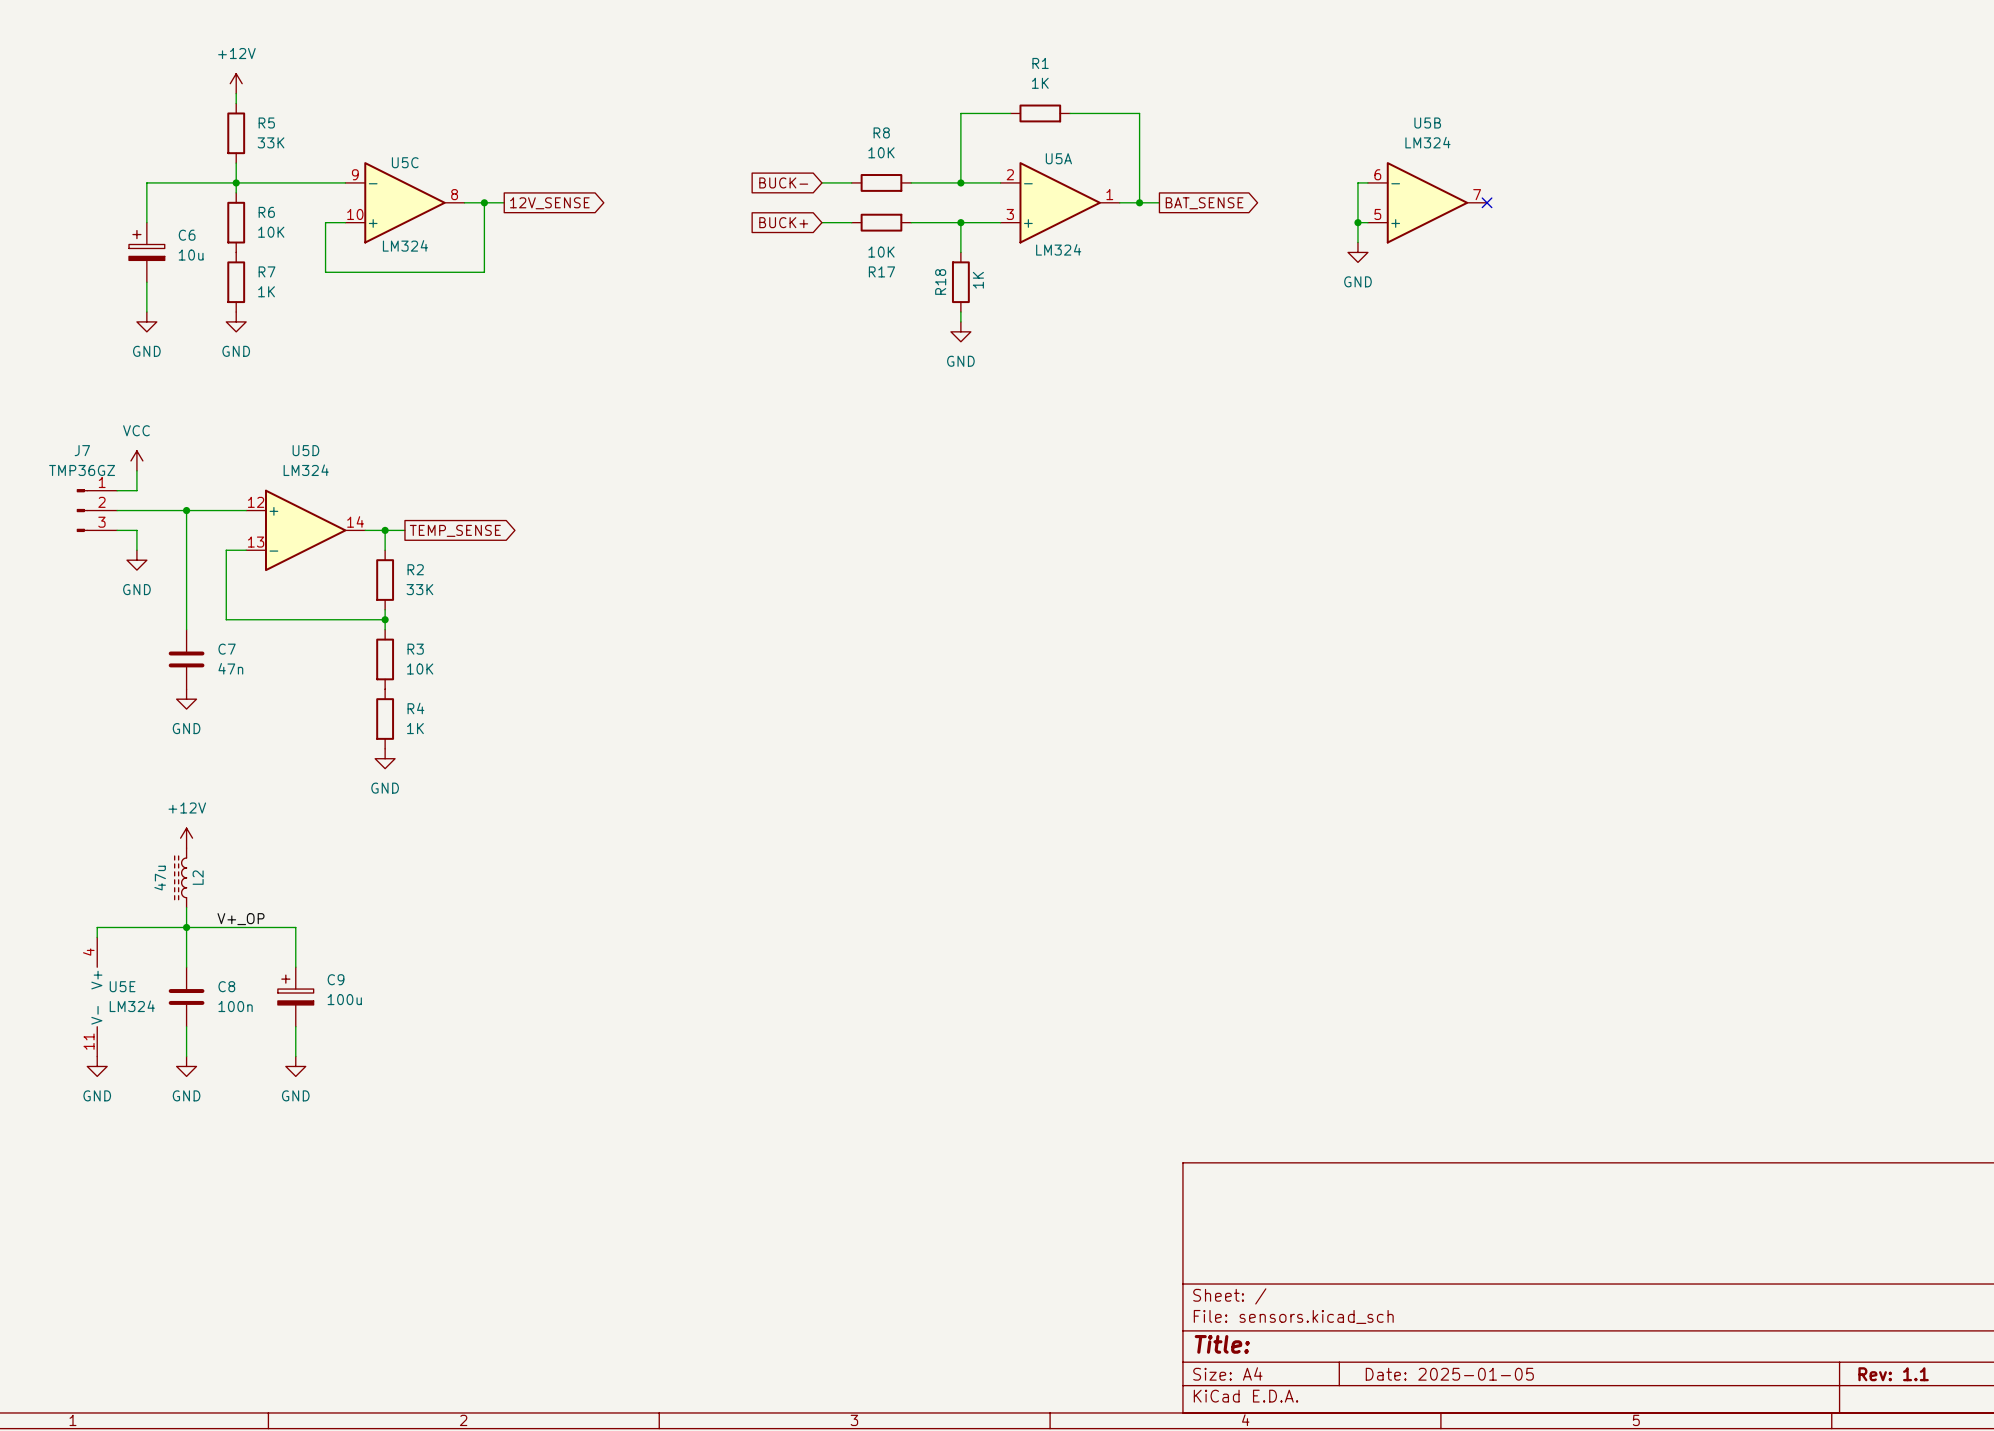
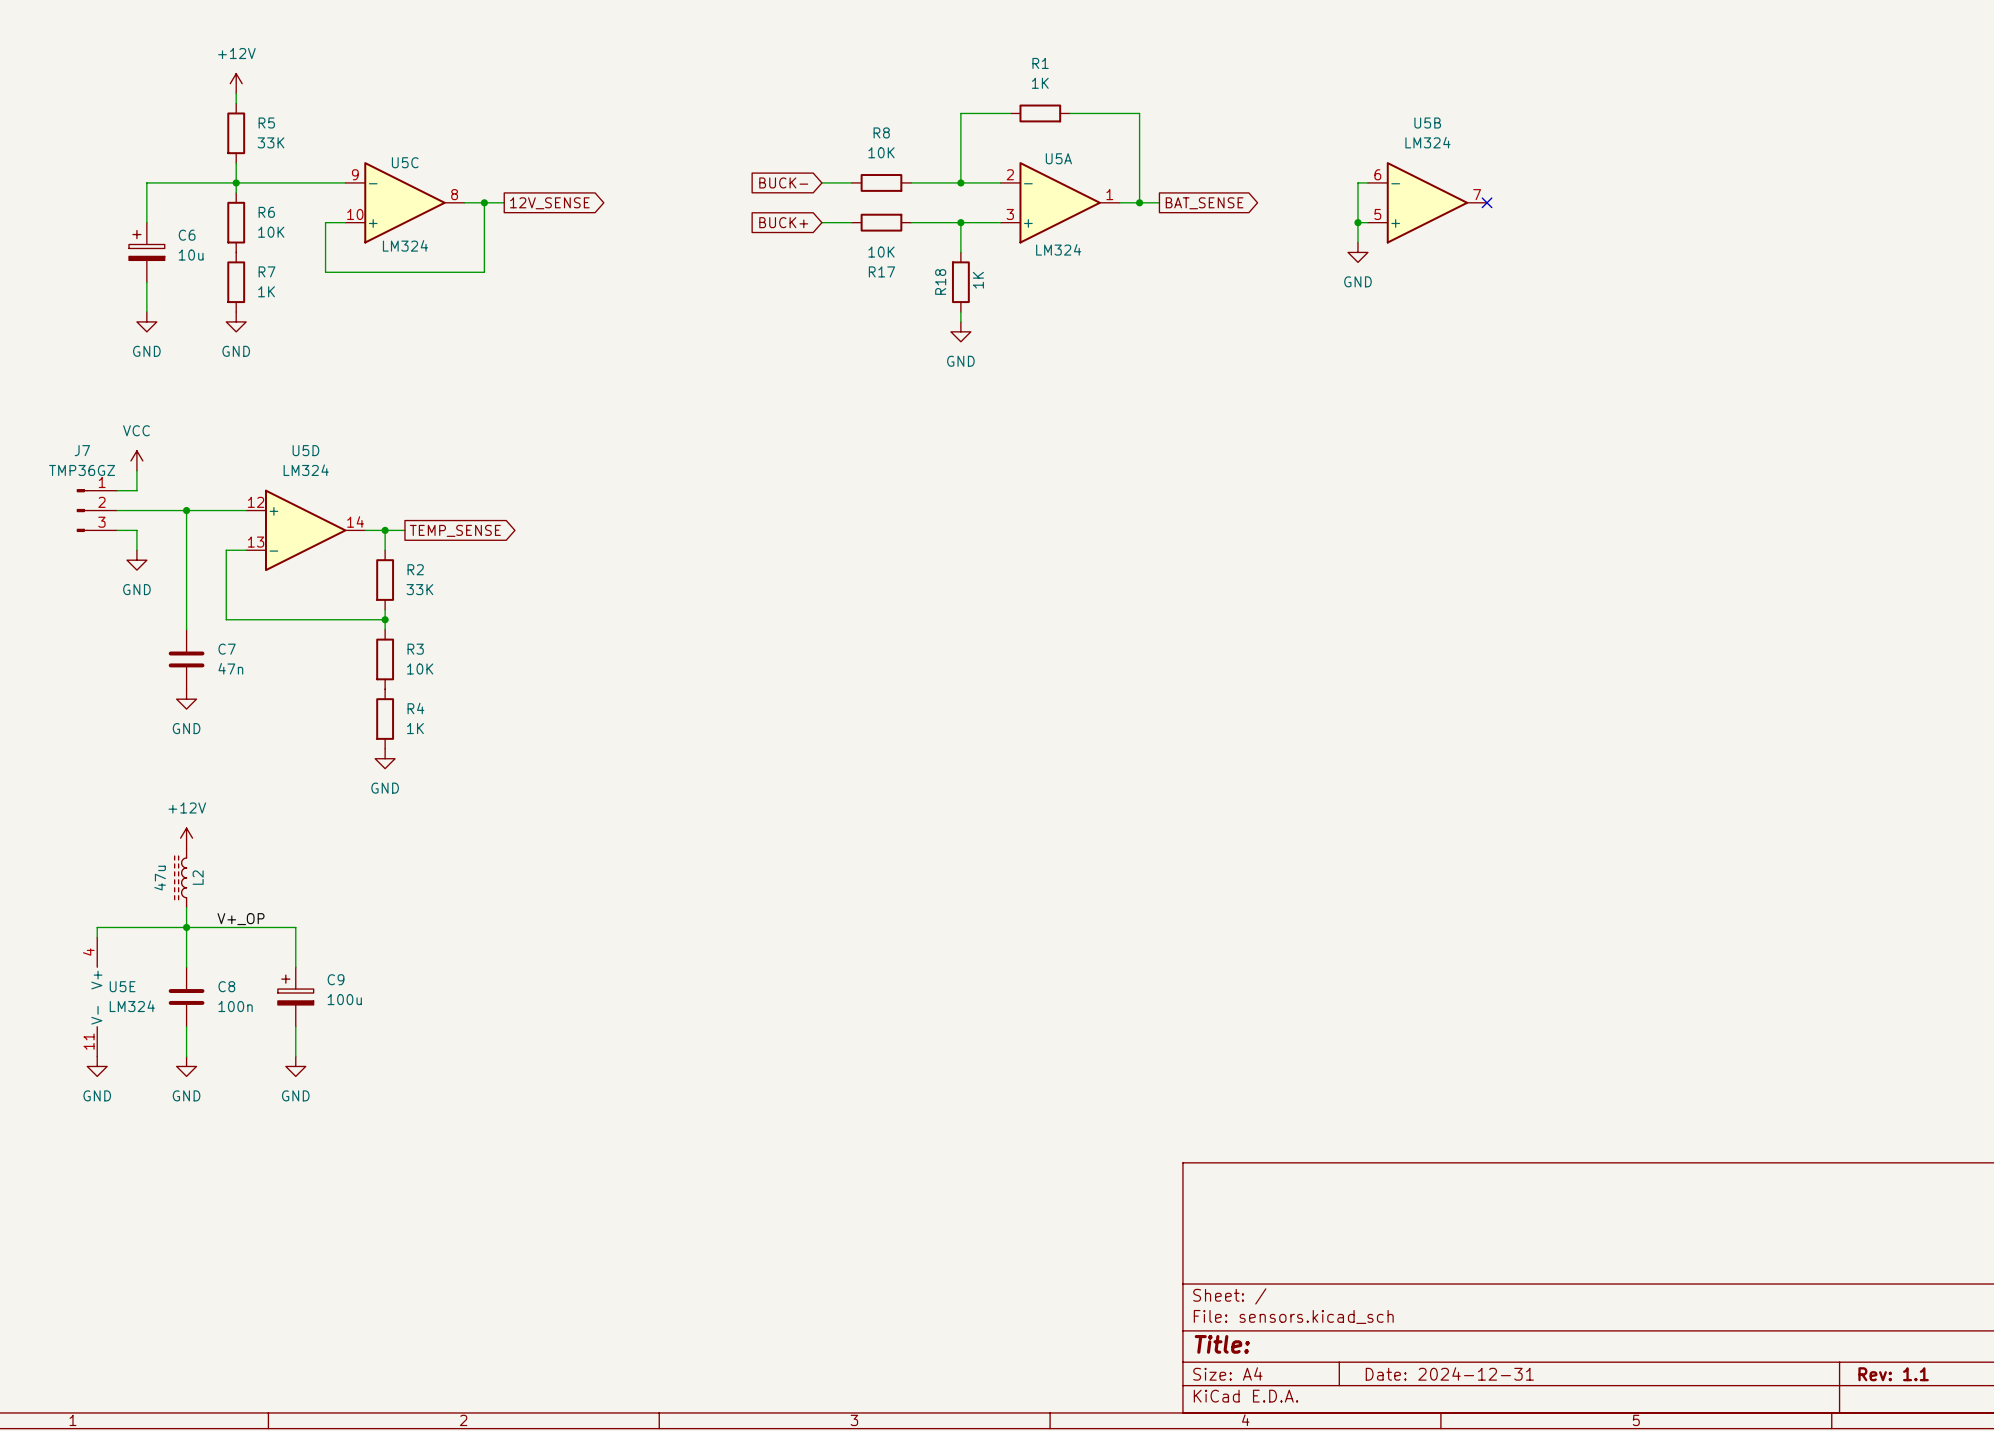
title block: Date: 2025-01-05 (1449, 1374) -> Date: 2024-12-31 (1449, 1373)

